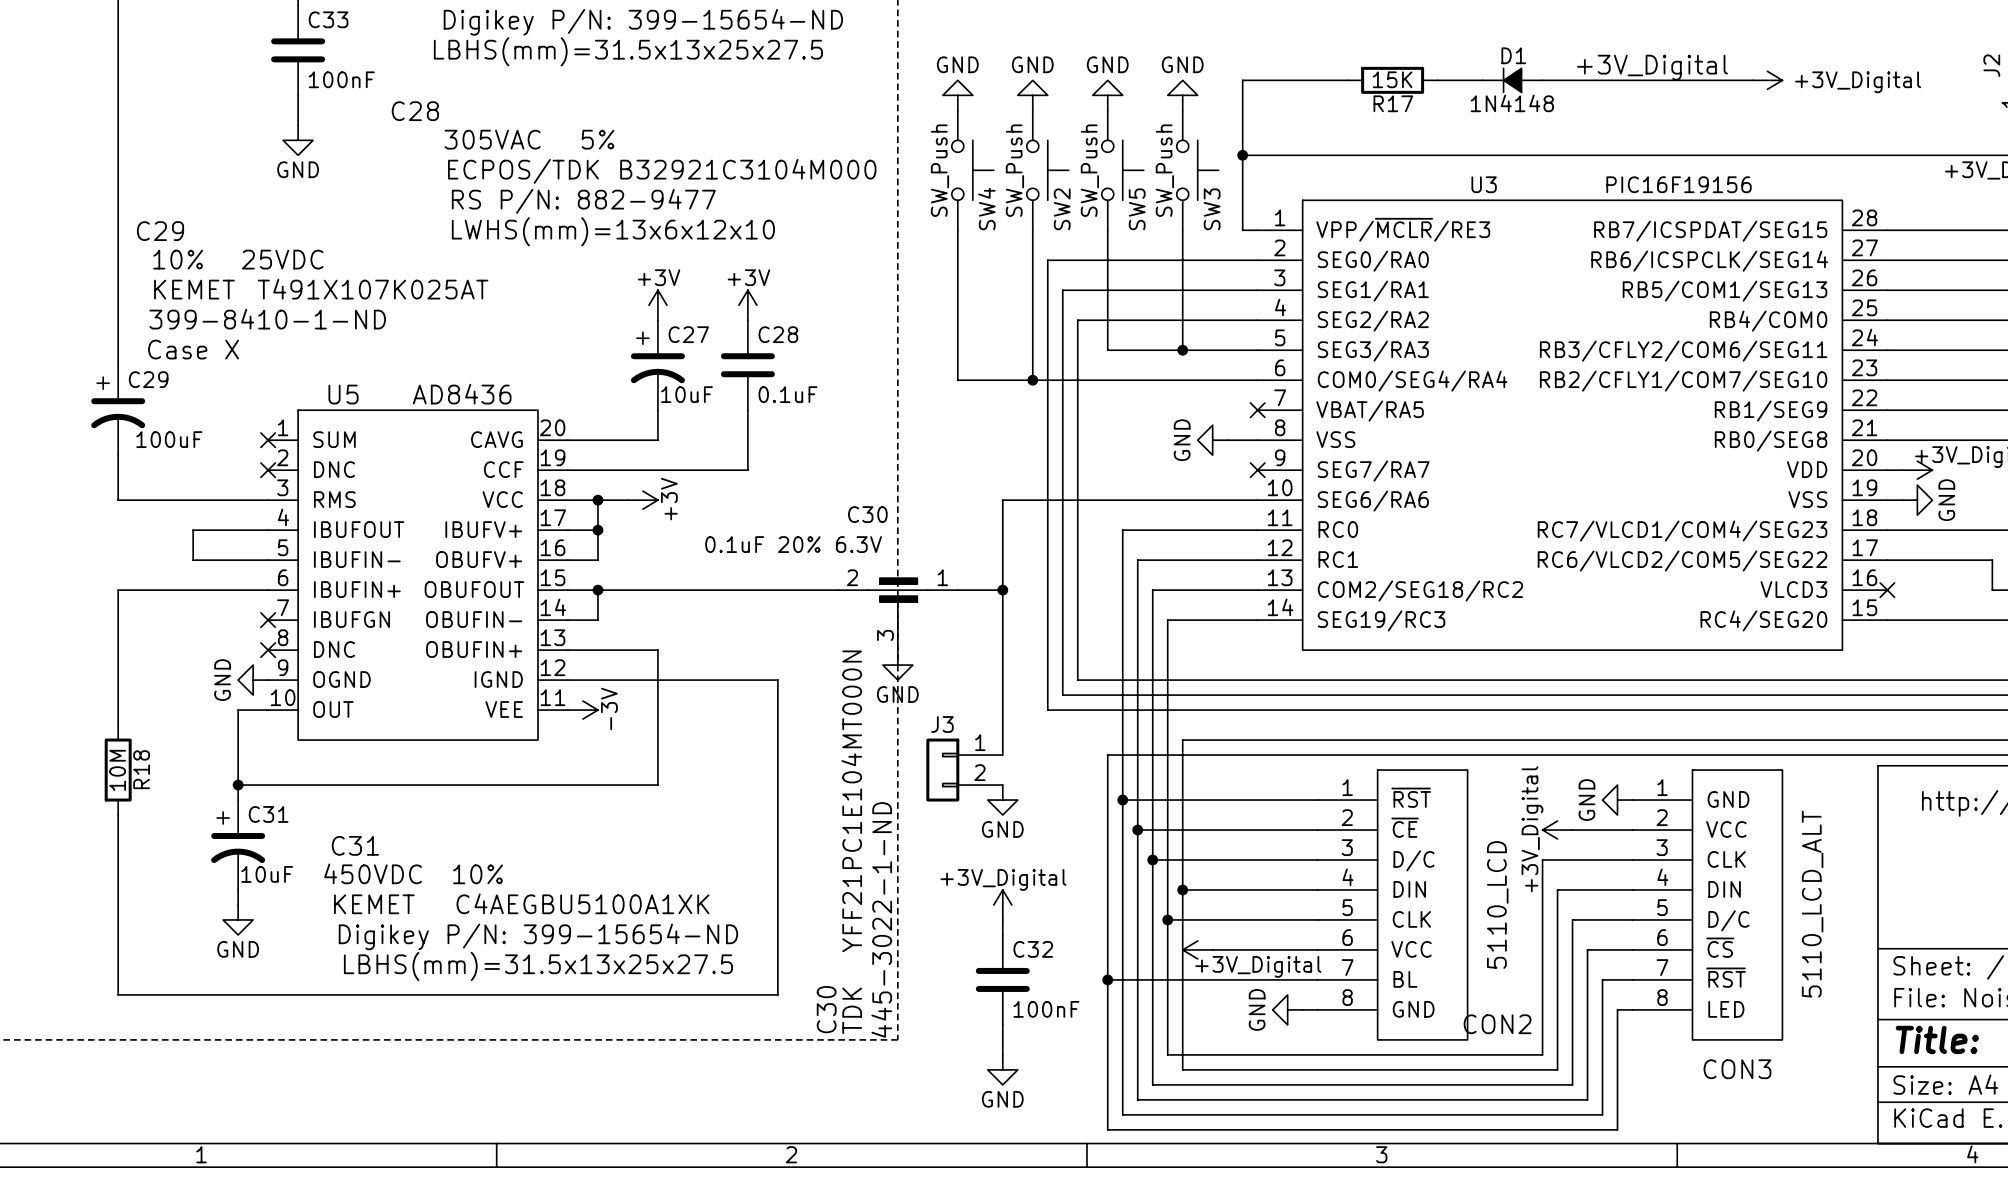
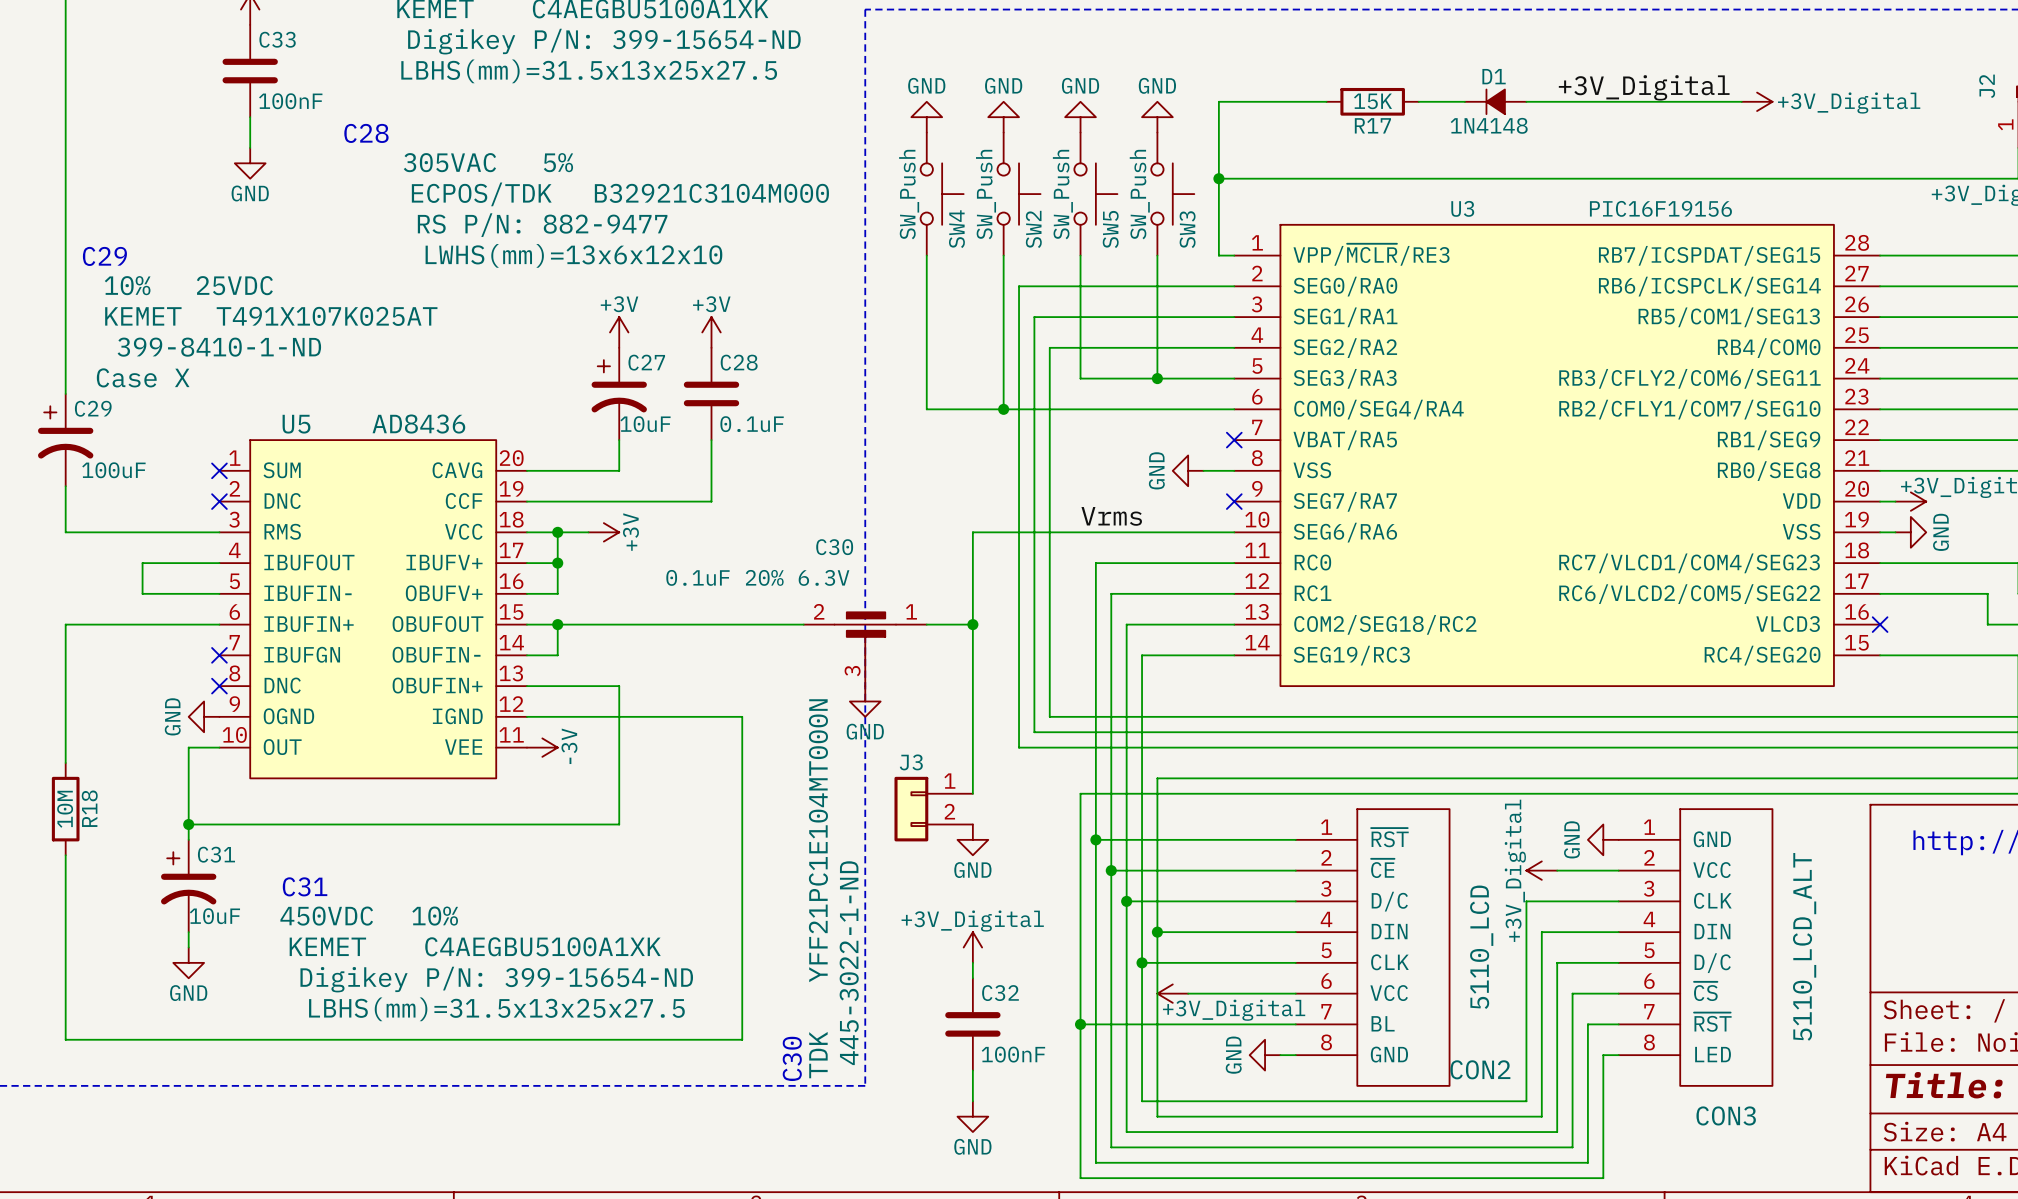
label: none -> Vrms (1111, 516)

